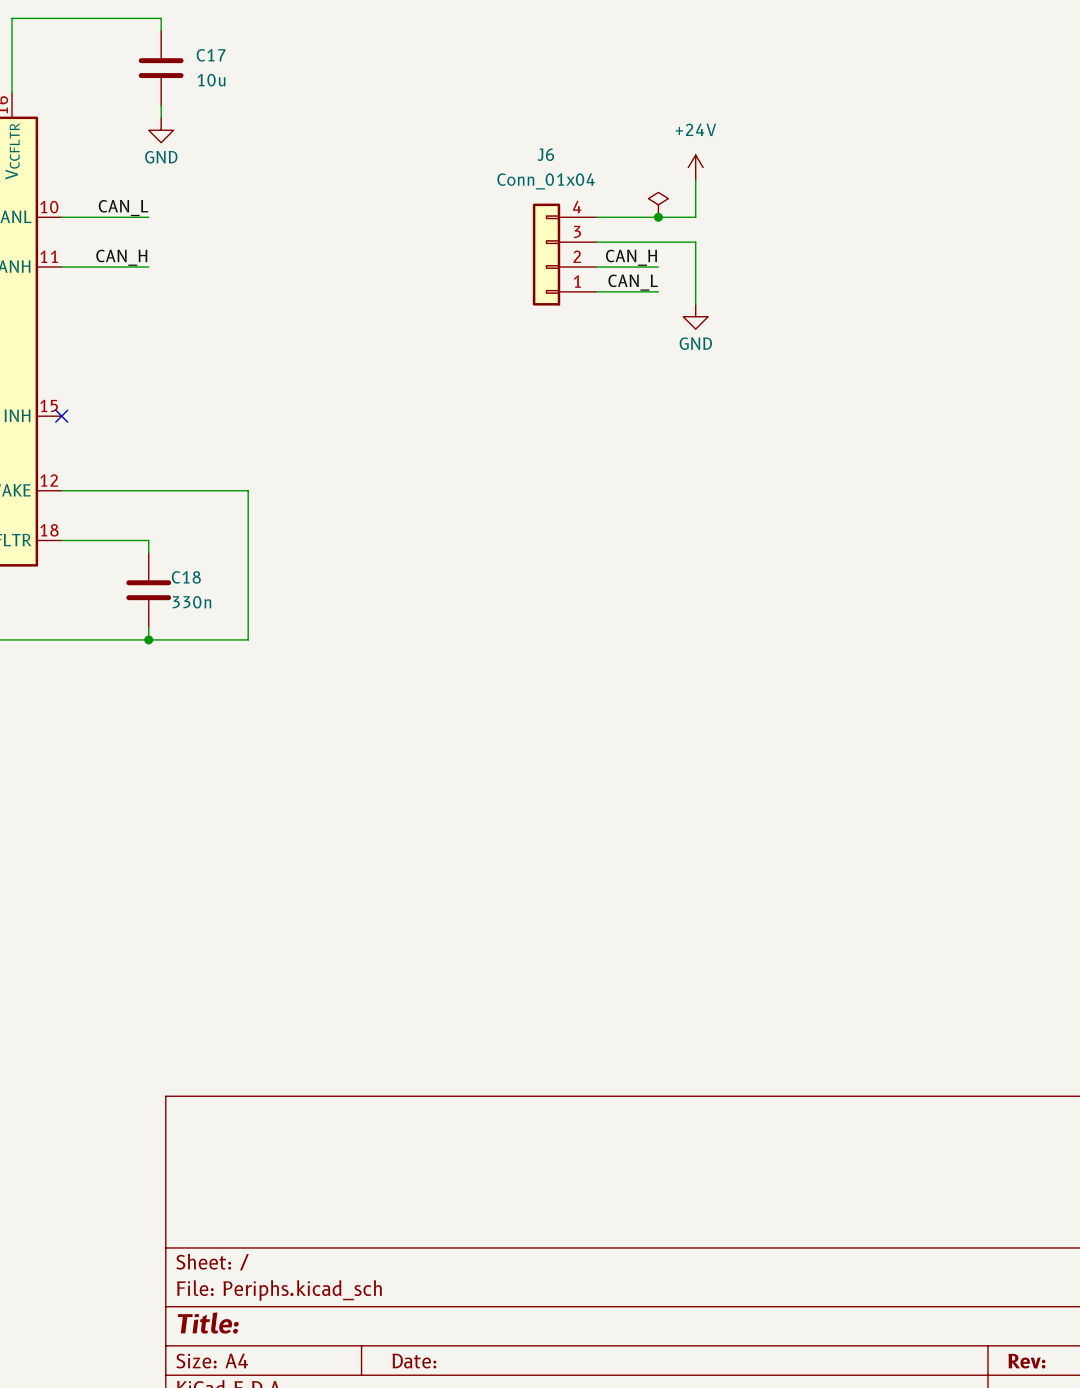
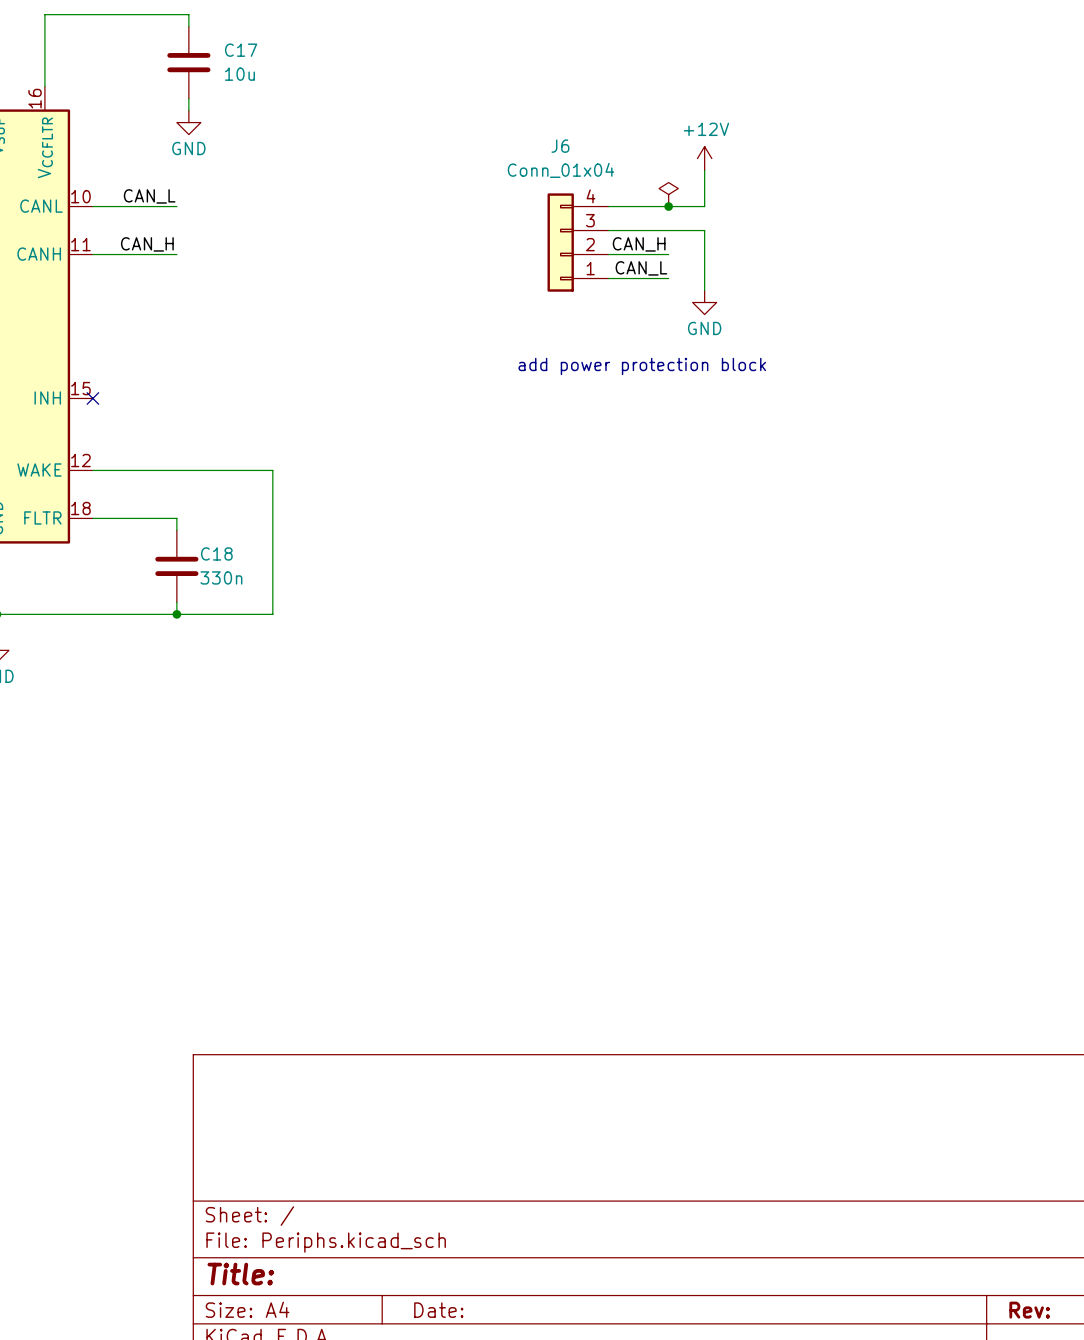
power symbol: +24V (695, 167) -> +12V (704, 158)
text: none -> add power protection block (642, 366)

